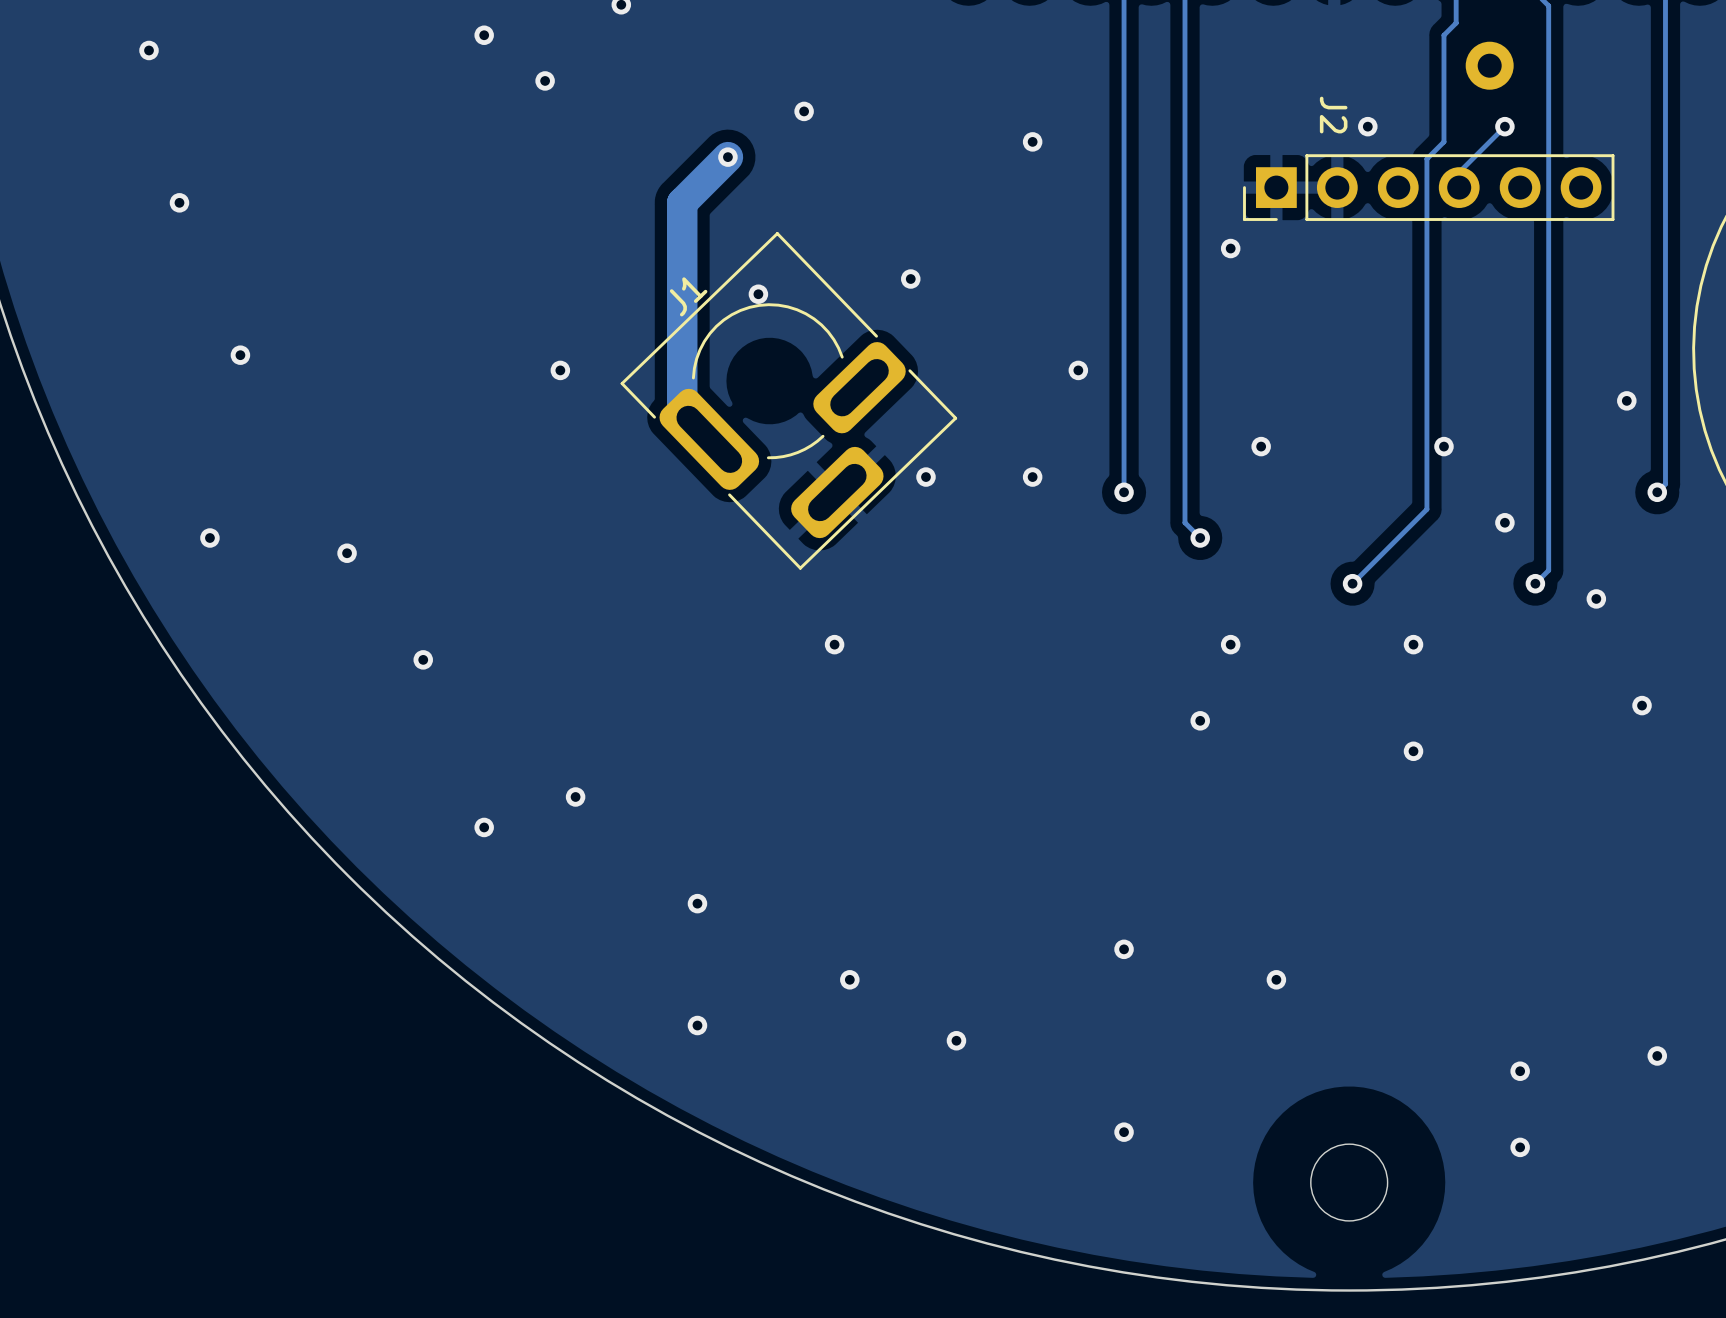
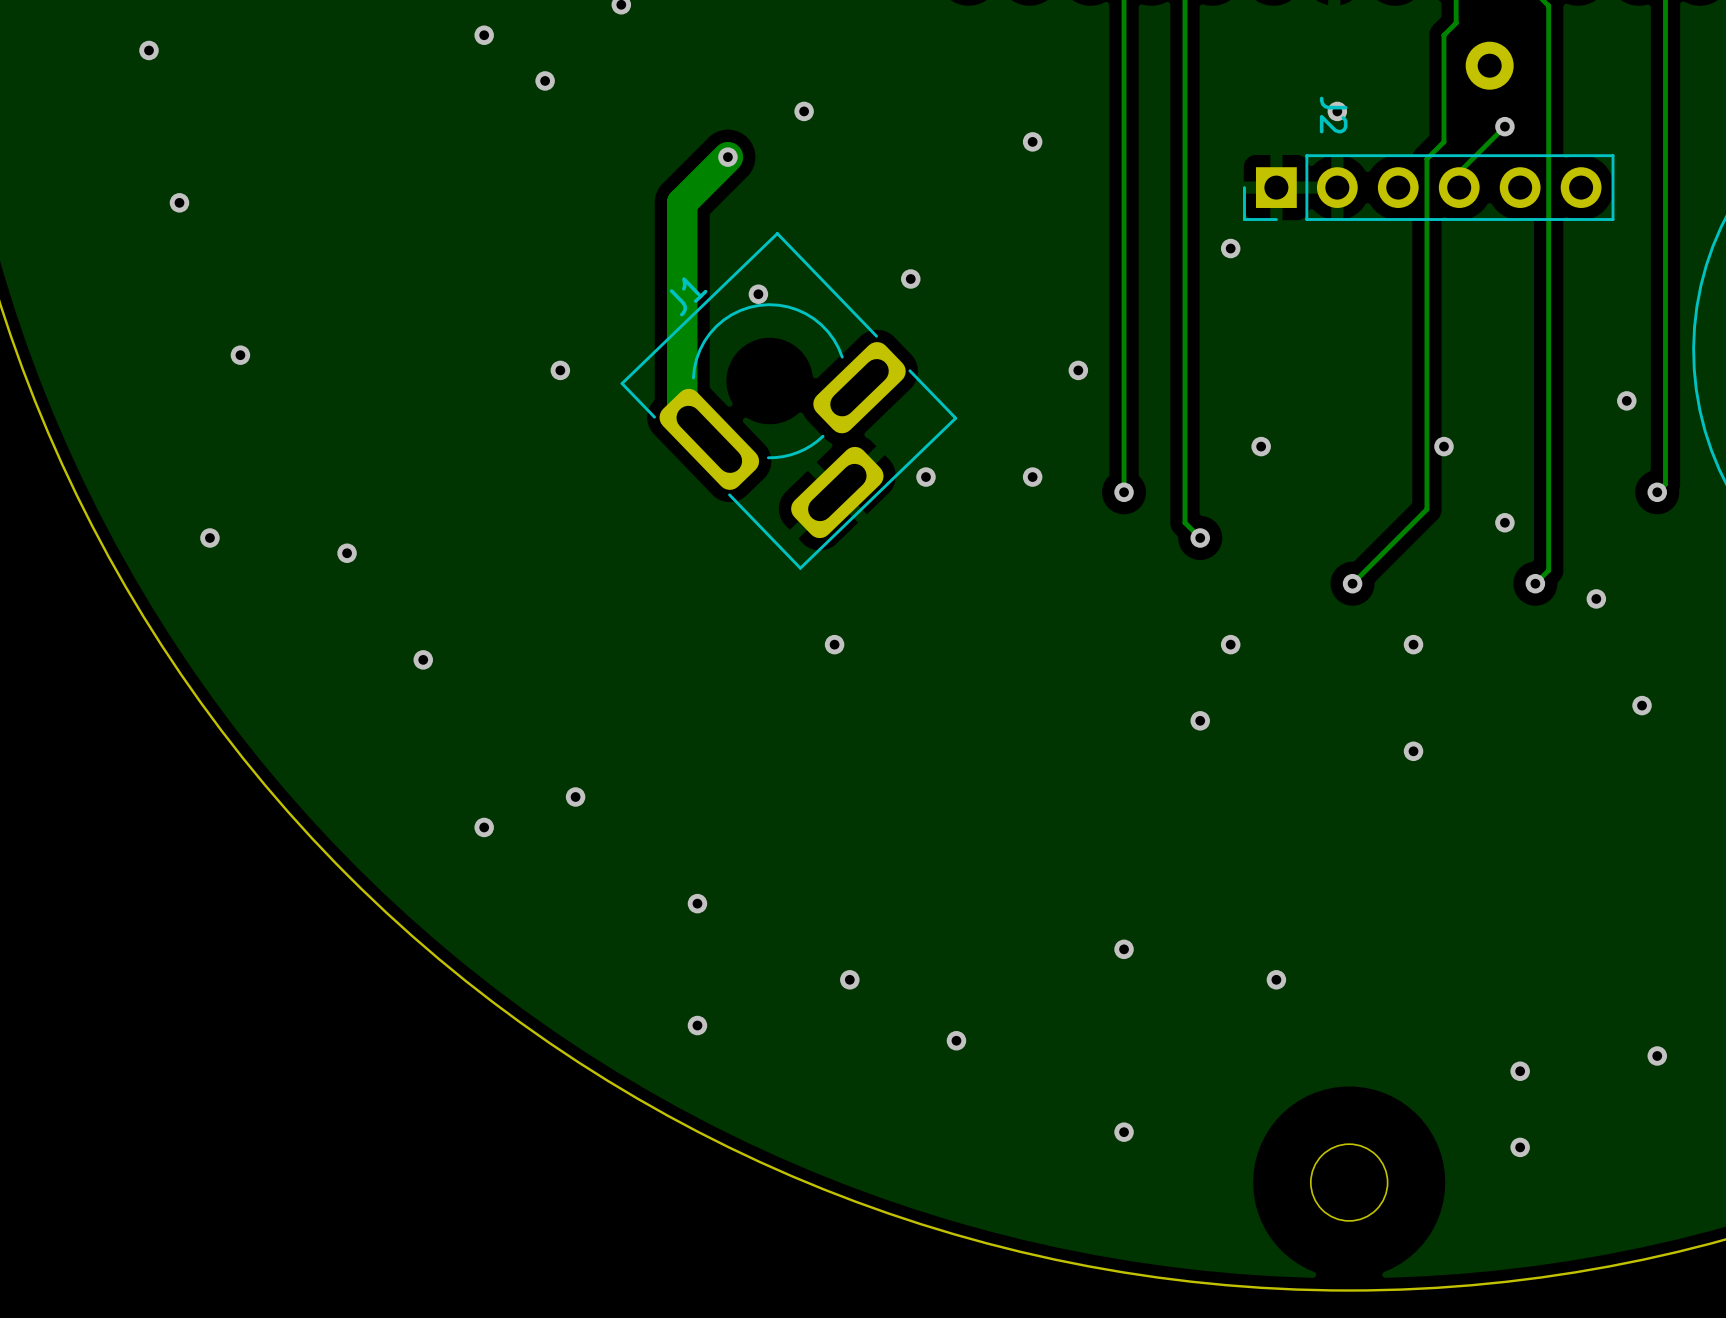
via position: (1367, 126) -> (1337, 111)

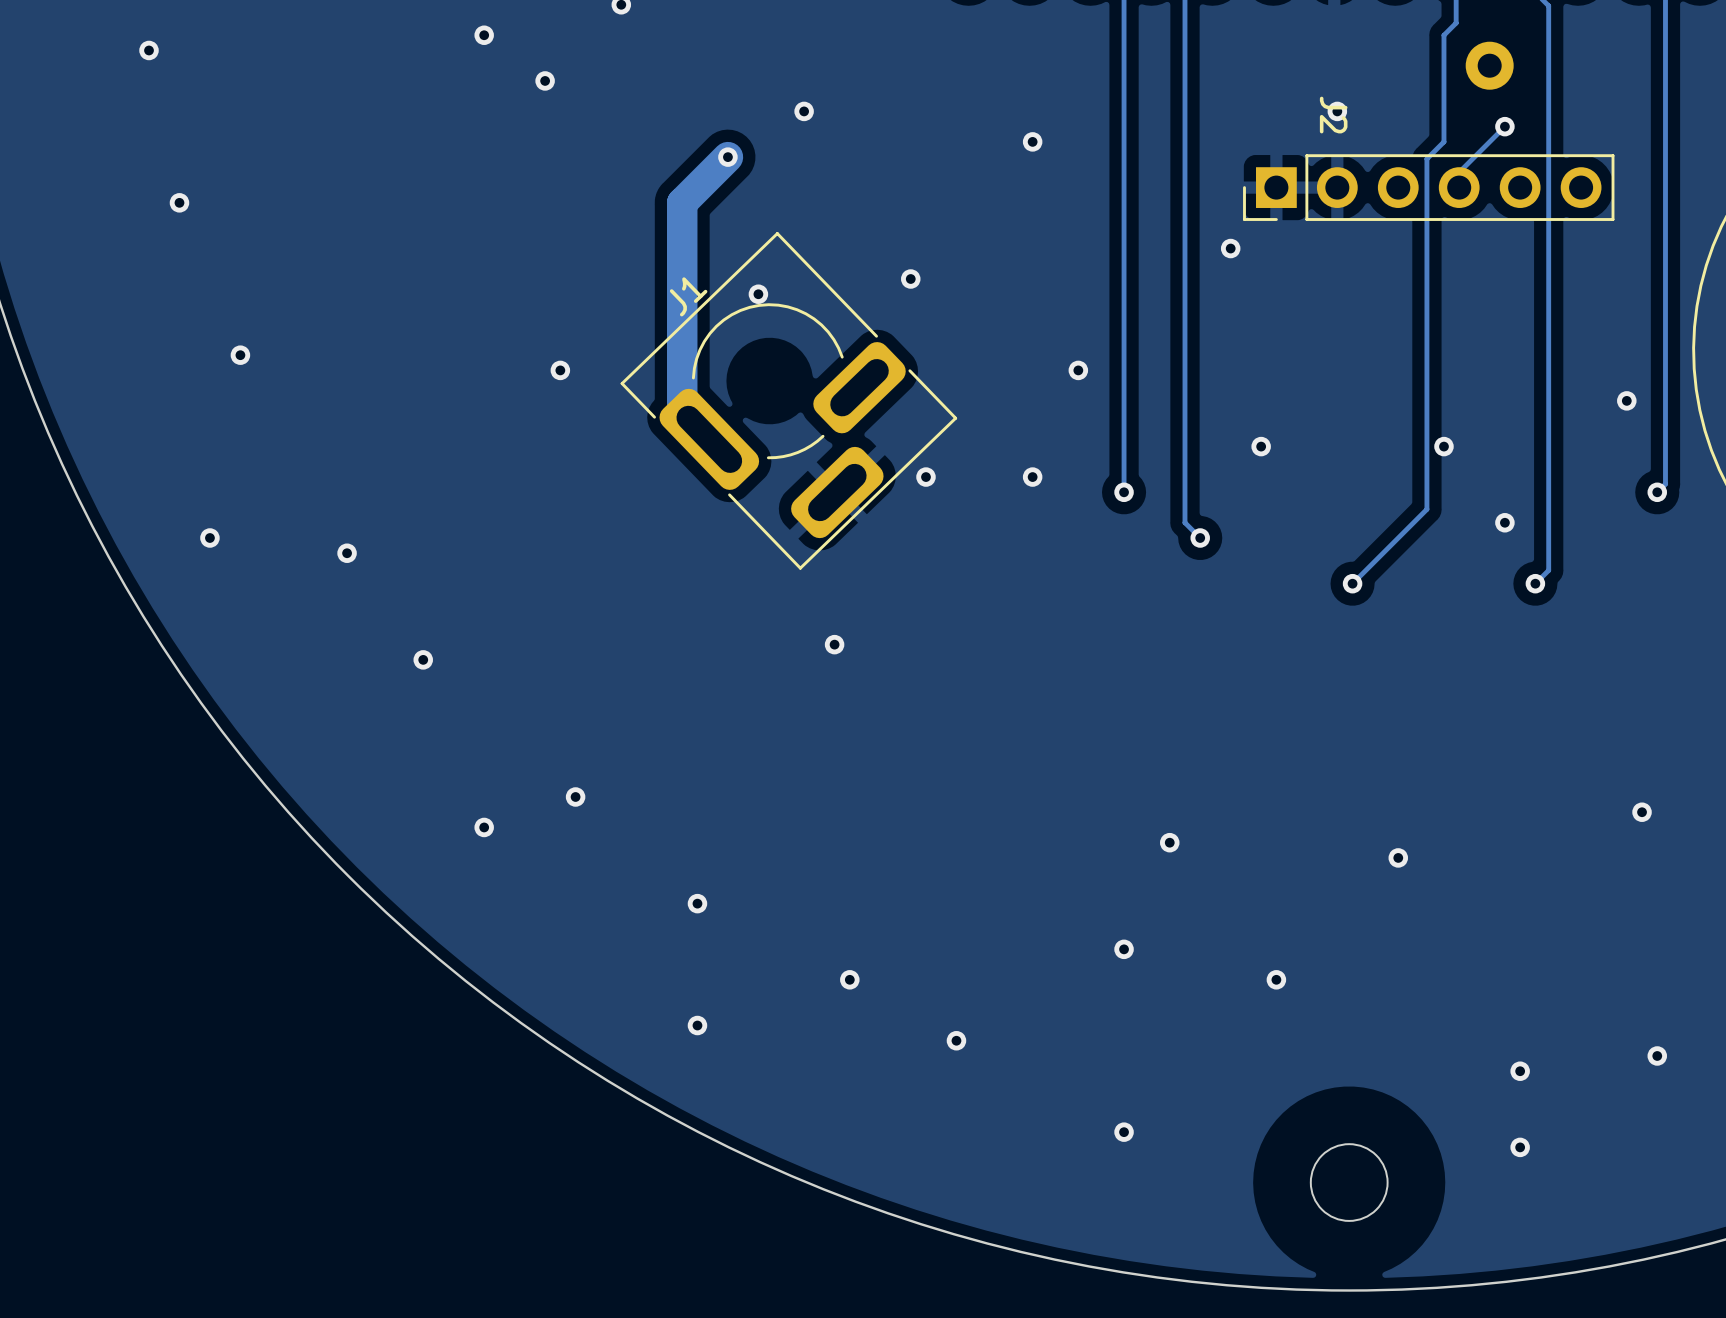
via: (1596, 598) -> none
via: (1230, 644) -> none
via: (1413, 644) -> none
via position: (1642, 705) -> (1642, 812)
via: (1200, 720) -> none
via: (1413, 751) -> none
via: none -> (1169, 842)
via: none -> (1398, 857)

